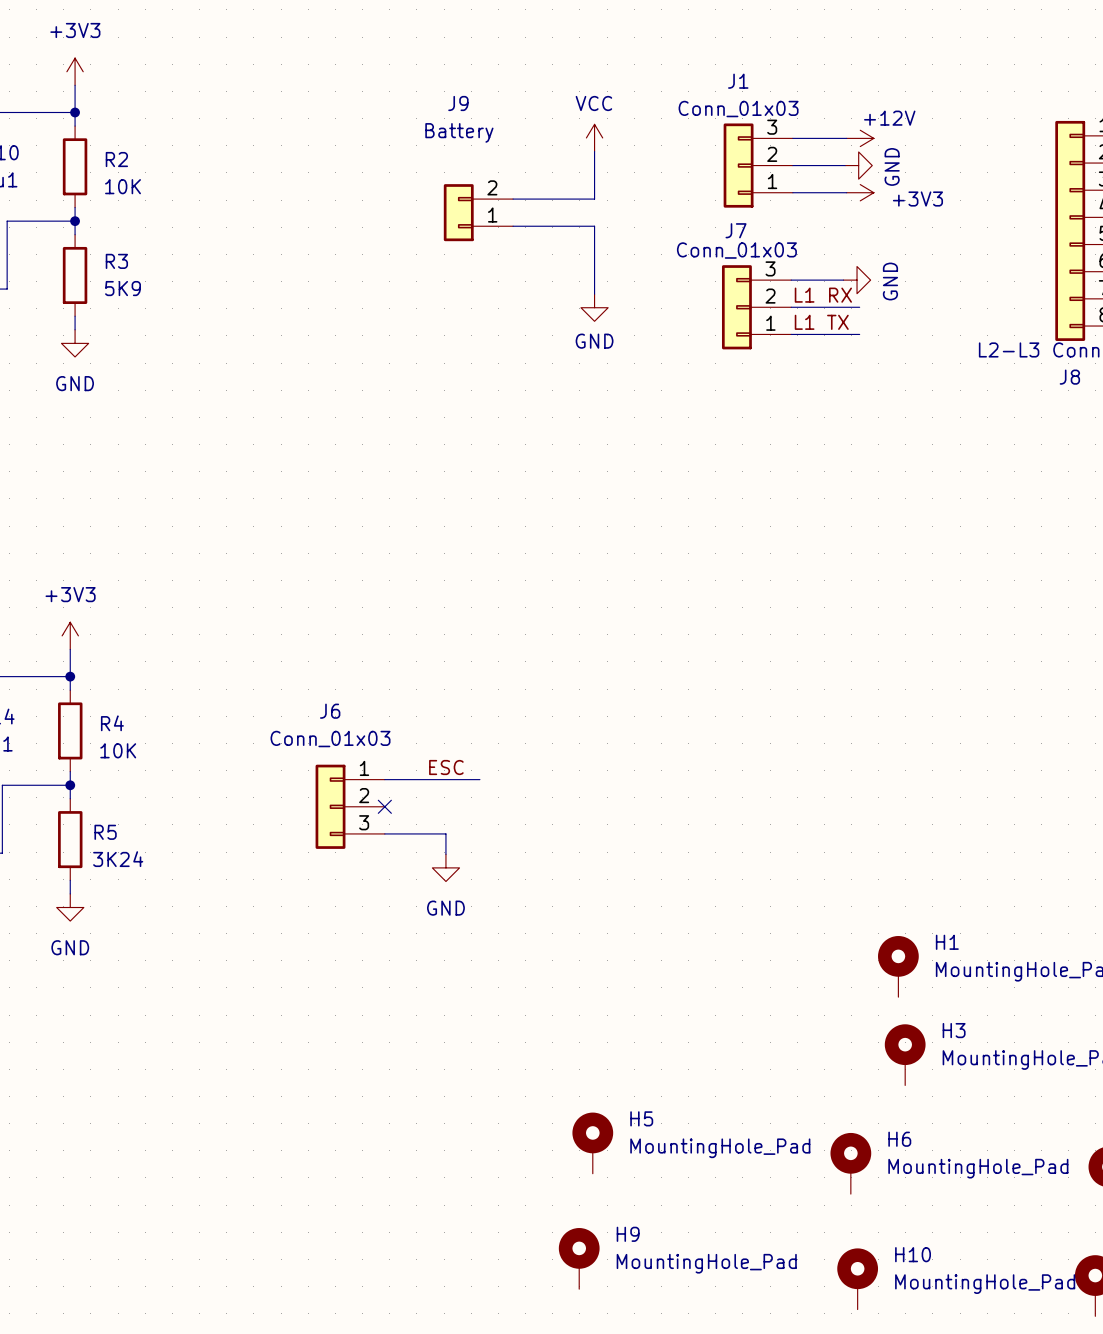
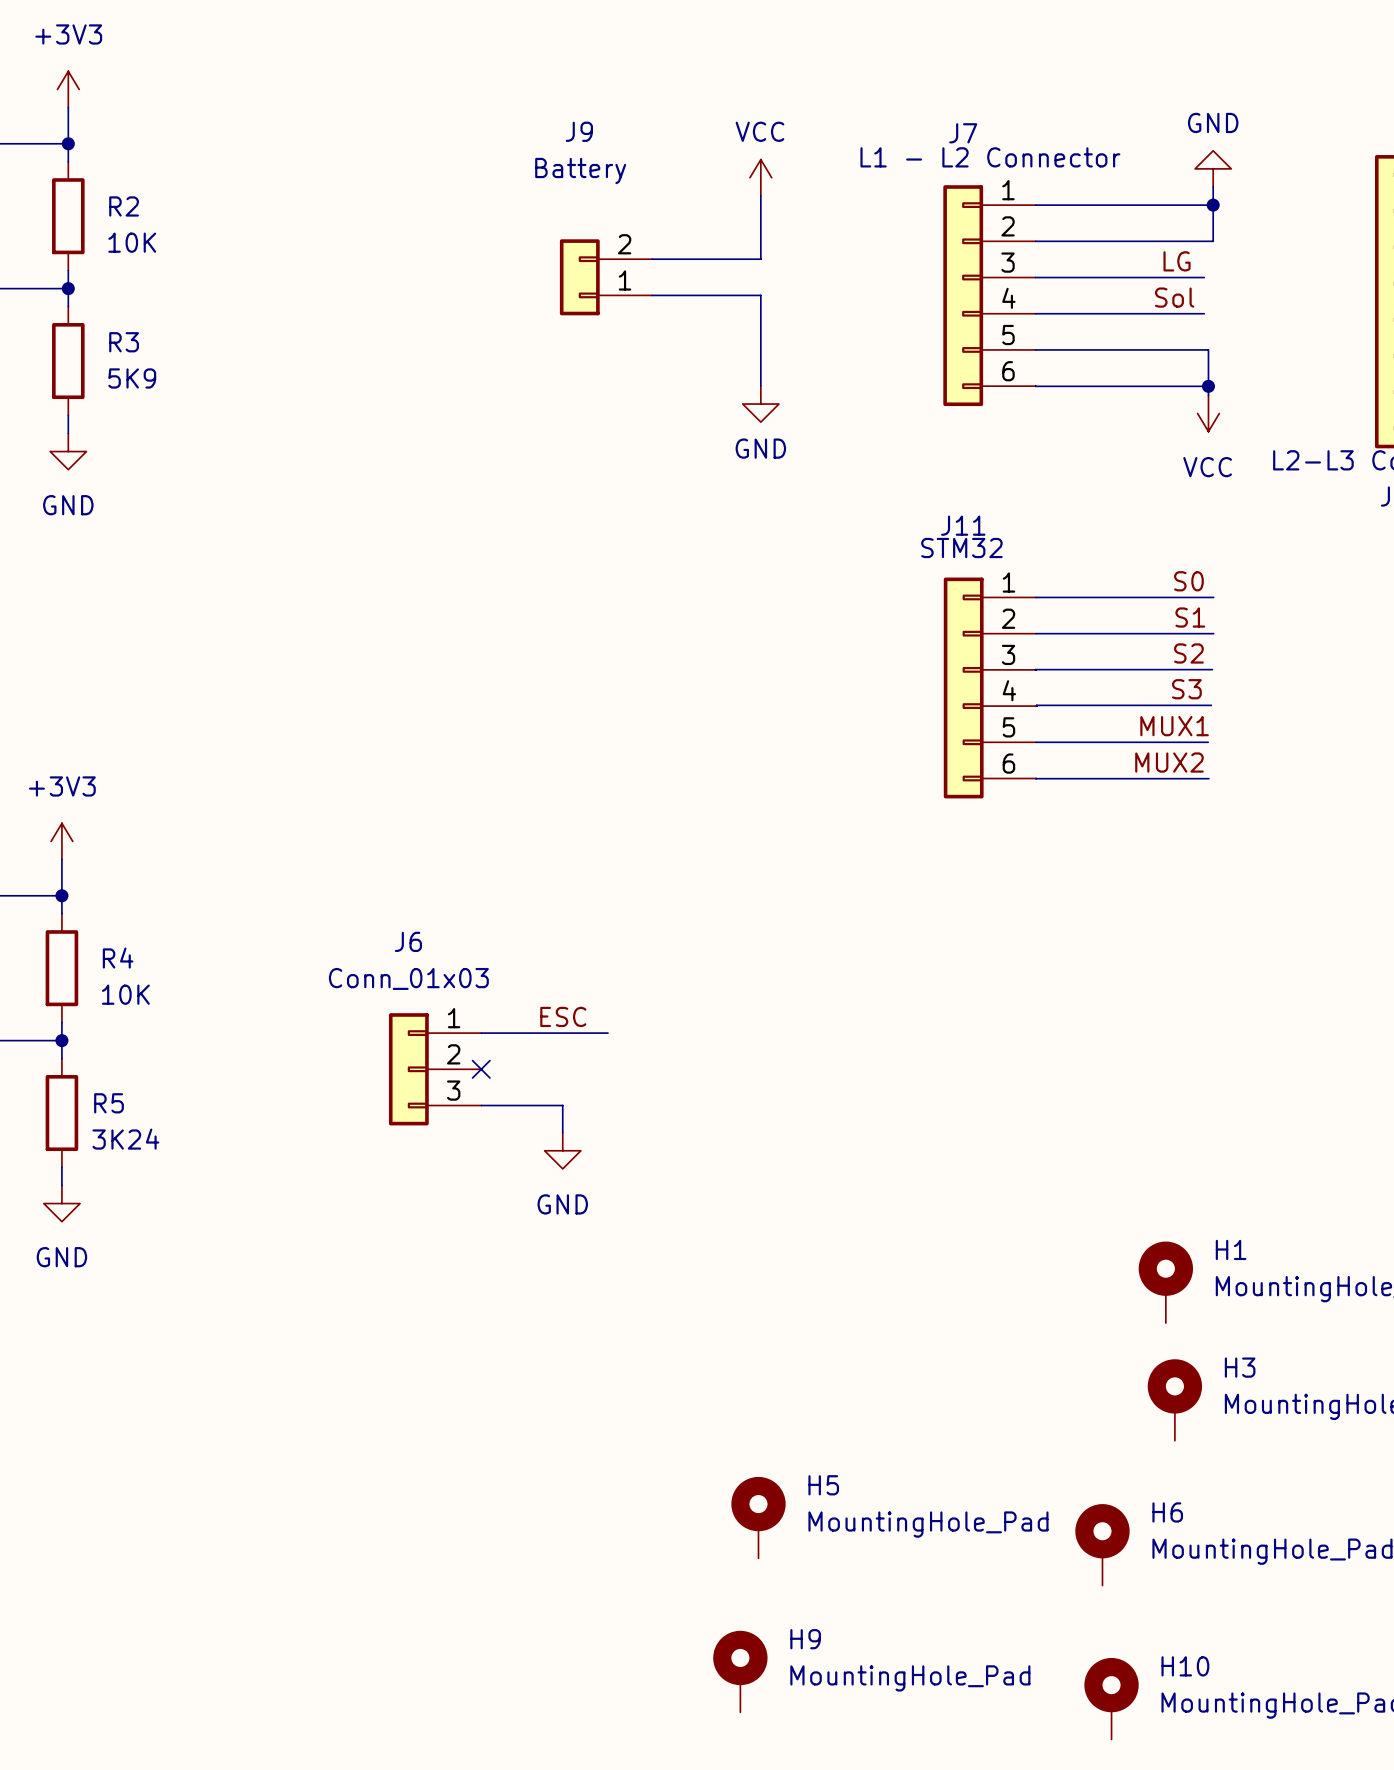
wire: (792, 138) (846, 138) -> none
power symbol: +12V (860, 138) -> none
wire: none -> (1213, 187) (1213, 241) (1035, 241)
wire: none -> (1035, 205) (1213, 205)
junction: none -> (1213, 205)
J1: Conn_01x03 (758, 165) -> none
wire: (792, 165) (845, 165) -> none
power symbol rotation: 0° (858, 165) -> 90° counterclockwise (1213, 168)
power symbol position: GND (858, 165) -> GND (1213, 168)
wire: (792, 192) (846, 192) -> none
power symbol: +3V3 (860, 192) -> none
label: none -> LG (1177, 261)
wire: none -> (1035, 277) (1204, 277)
label: none -> Sol (1174, 297)
J7 name position: J7 (736, 230) -> J7 (963, 133)
wire: none -> (1035, 313) (1204, 313)
J7 value: Conn_01x03 (736, 250) -> L1 - L2 Connector (990, 157)
J7 symbol: [721, 265, 792, 350] -> [943, 185, 1036, 407]
wire: none -> (1035, 349) (1207, 349)
wire: none -> (1208, 350) (1208, 395)
wire: (791, 280) (843, 280) -> none
power symbol: GND (857, 280) -> none
wire: none -> (1035, 386) (1208, 386)
junction: none -> (1208, 386)
label: L1 RX (823, 295) -> none
wire: (791, 307) (859, 307) -> none
power symbol: none -> VCC (1208, 413)
label: L1 TX (821, 322) -> none
wire: (791, 334) (859, 334) -> none
label: none -> S0 (1188, 581)
wire: none -> (1036, 597) (1213, 597)
label: none -> S1 (1190, 617)
wire: none -> (1036, 633) (1213, 633)
label: none -> S2 (1188, 653)
wire: none -> (1035, 669) (1212, 669)
J11: none -> STM32 (989, 687)
label: none -> S3 (1186, 689)
wire: none -> (1211, 705) (1036, 706)
label: none -> MUX1 (1174, 726)
wire: none -> (1036, 742) (1208, 742)
label: none -> MUX2 (1169, 762)
wire: none -> (1036, 778) (1208, 778)

